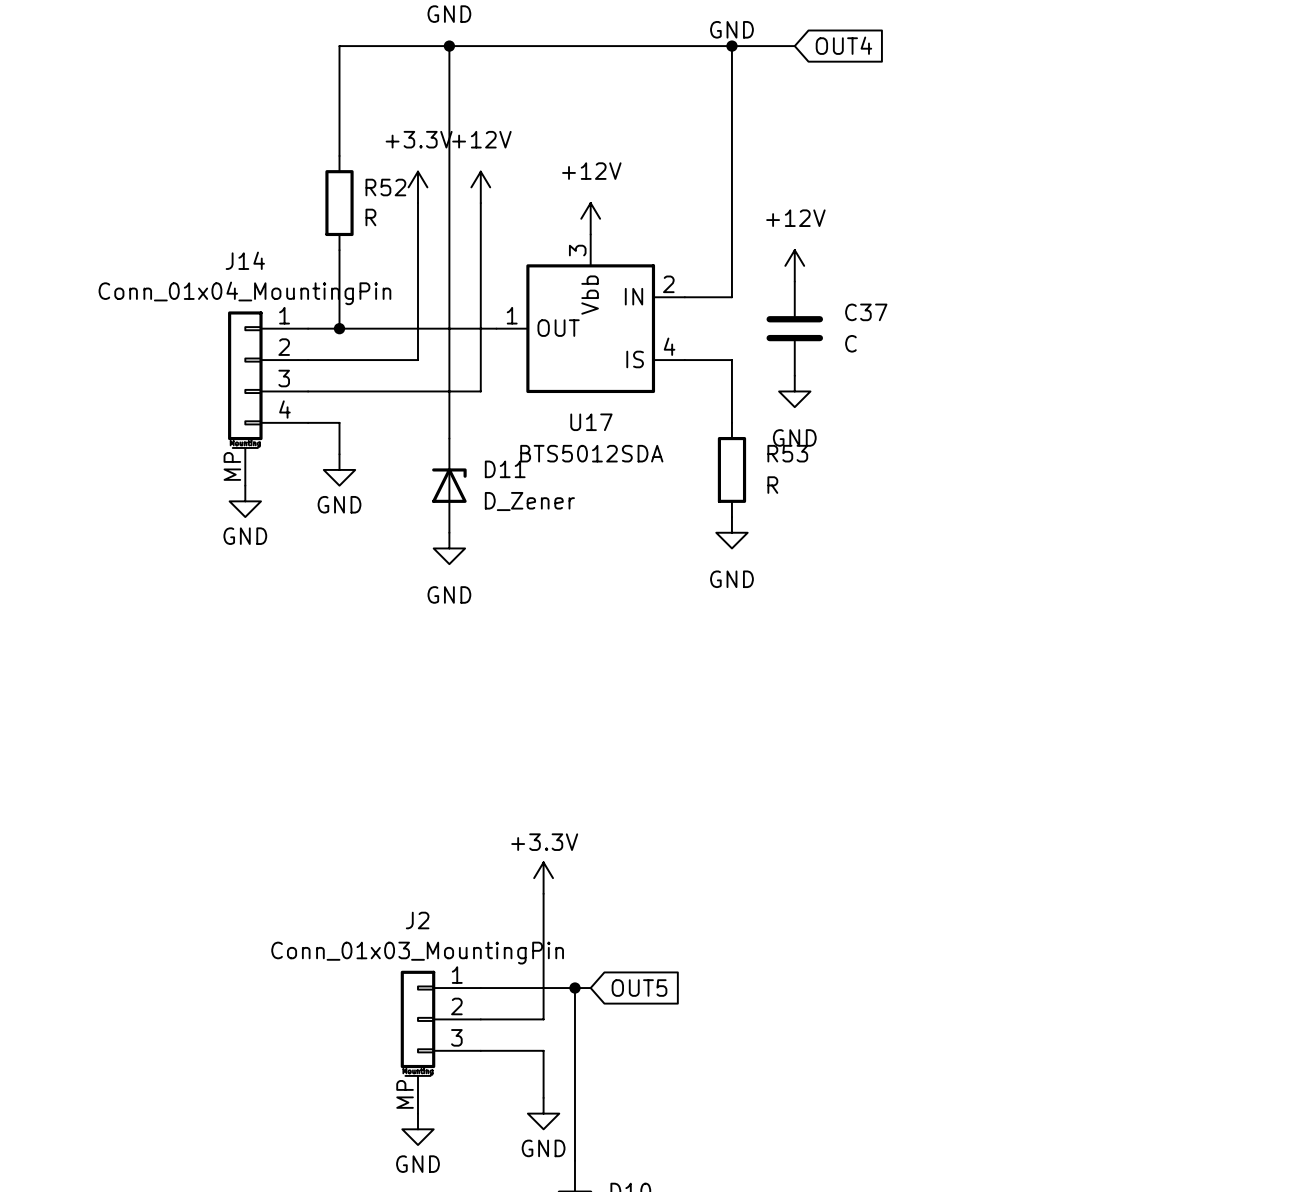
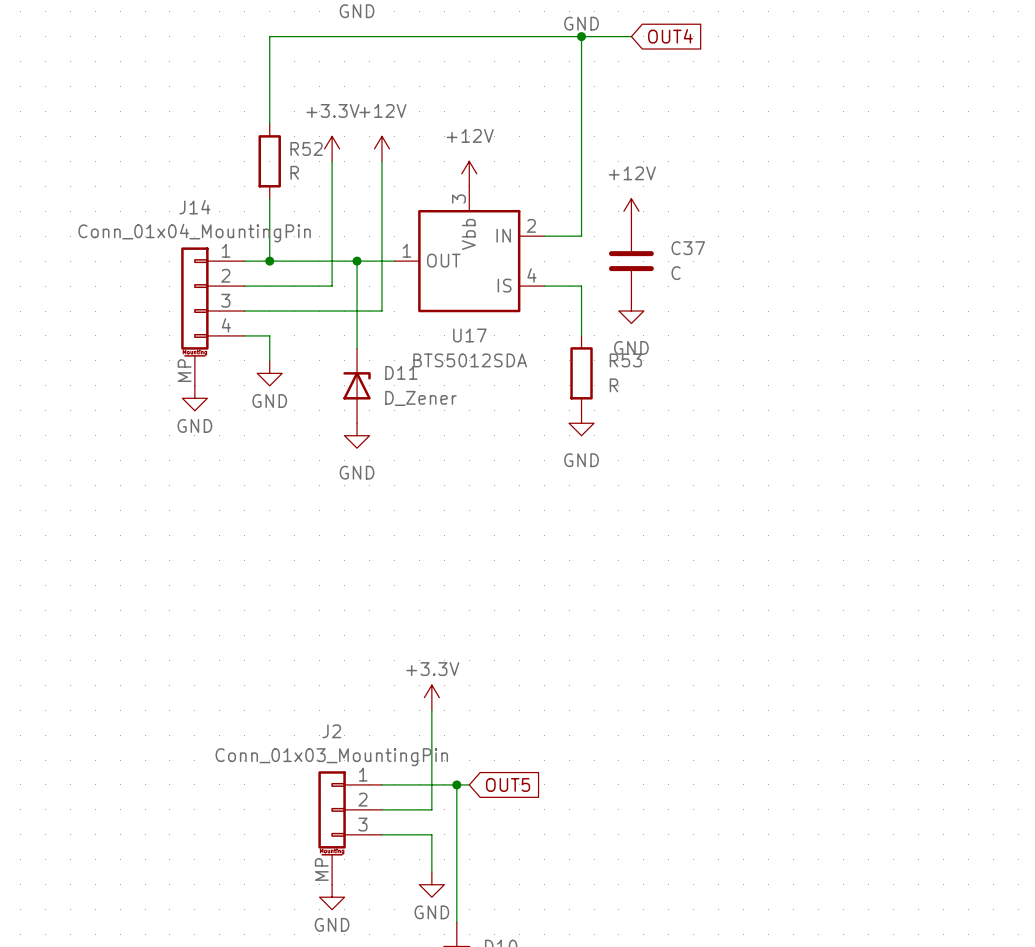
wire: (449, 46) (449, 328) -> none
junction: (449, 46) -> none
junction: none -> (357, 261)

